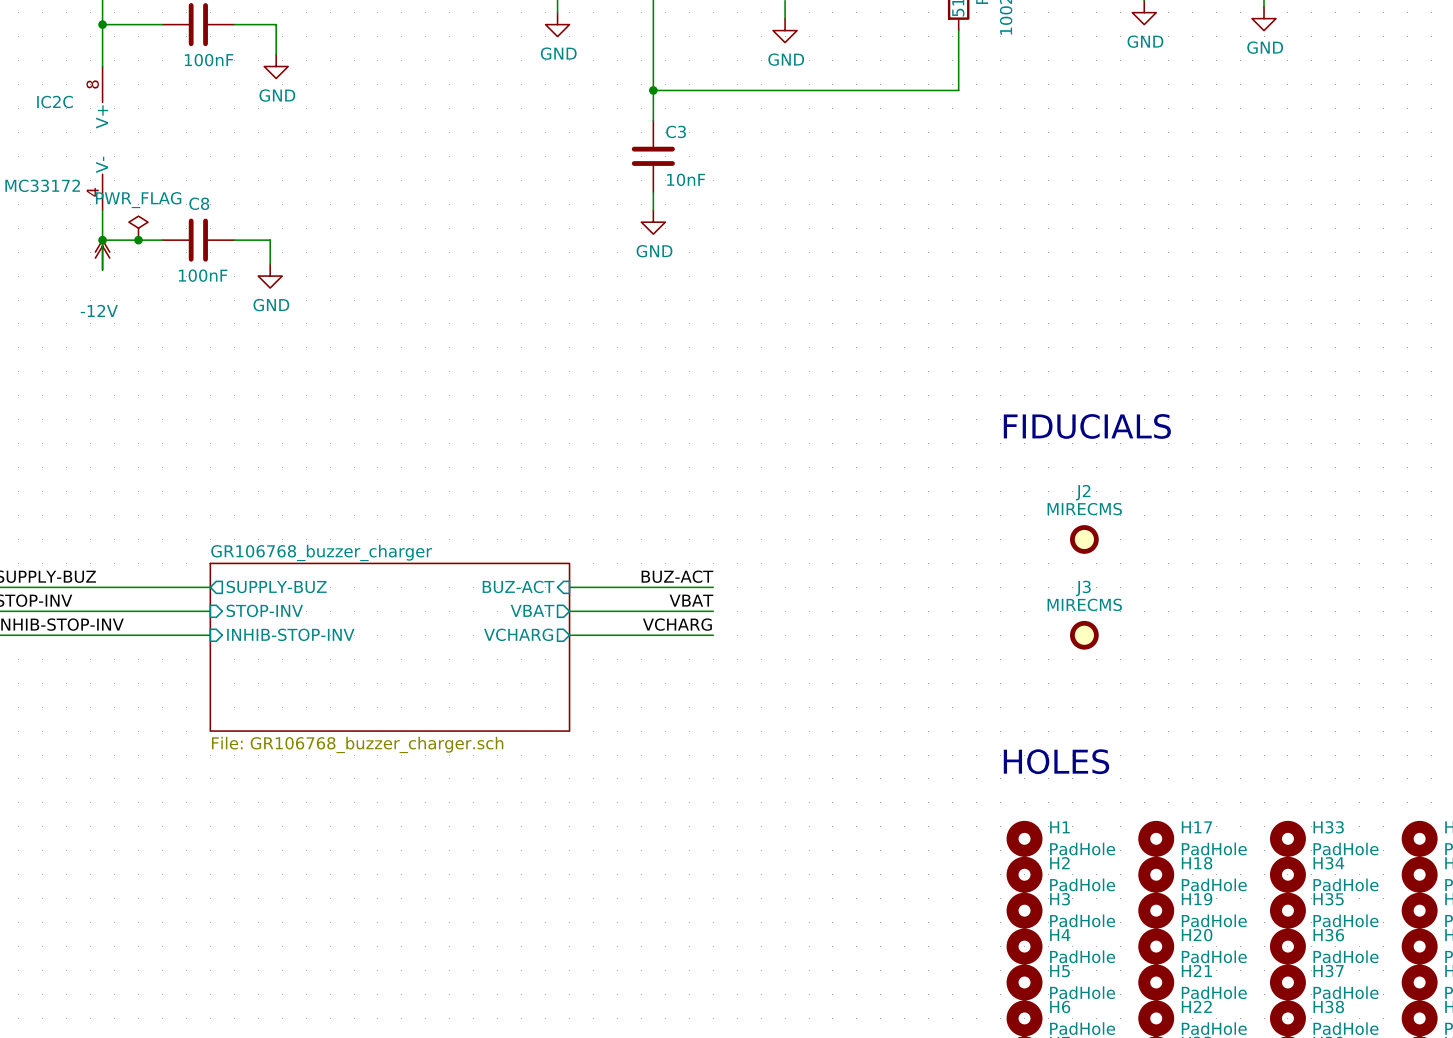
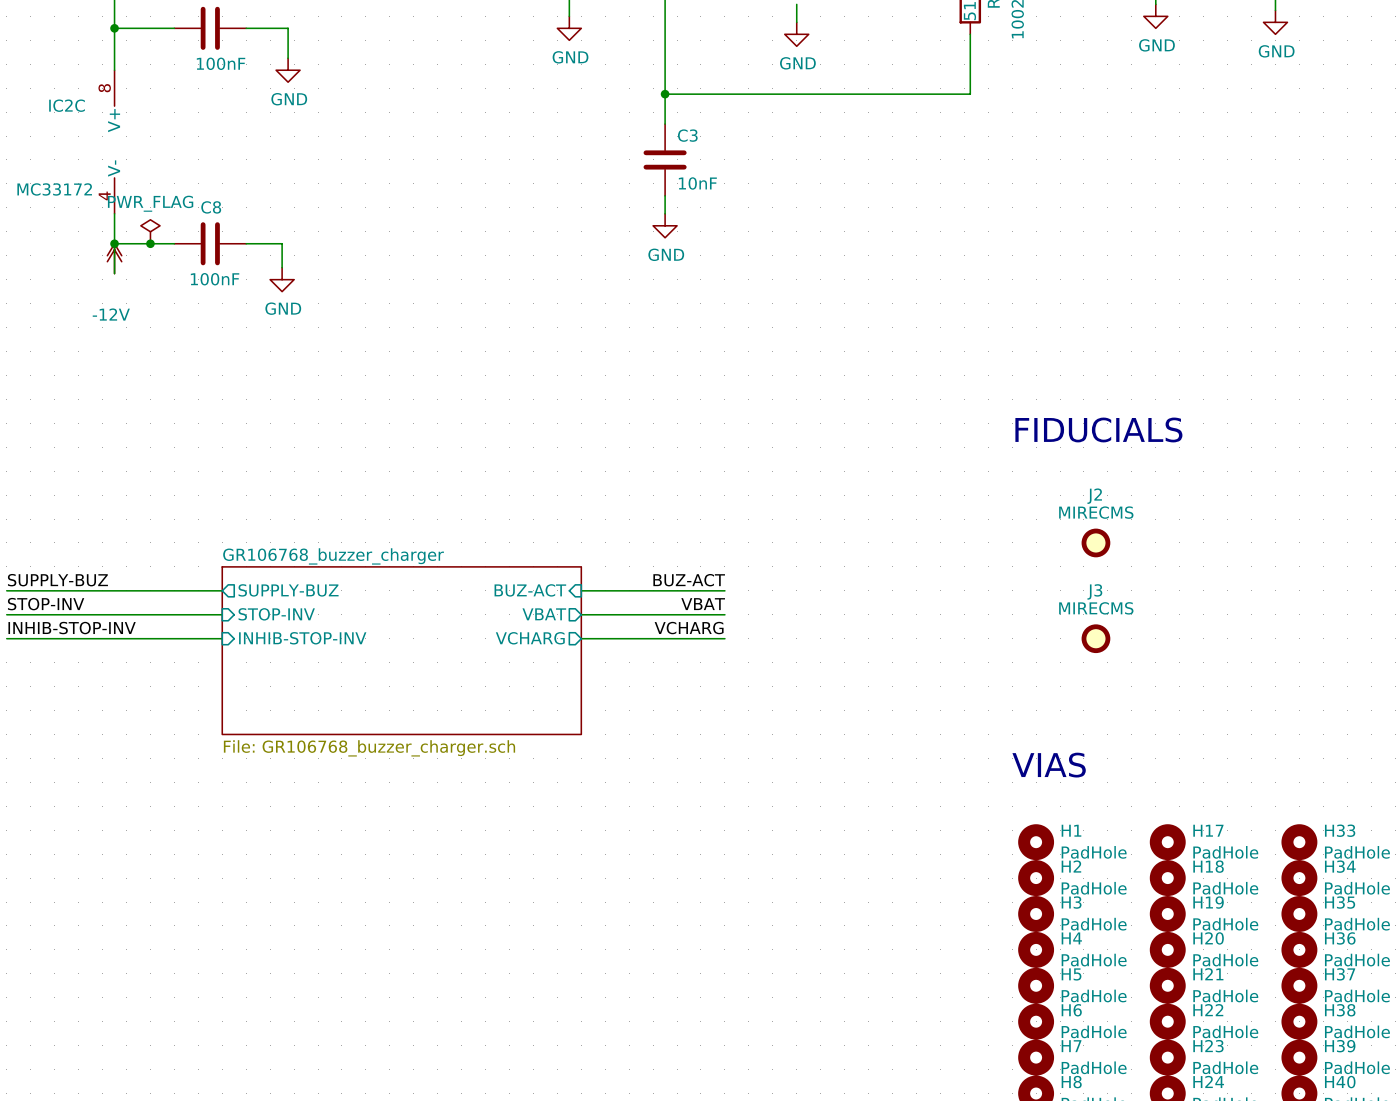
text: HOLES (1056, 761) -> VIAS (1049, 765)

